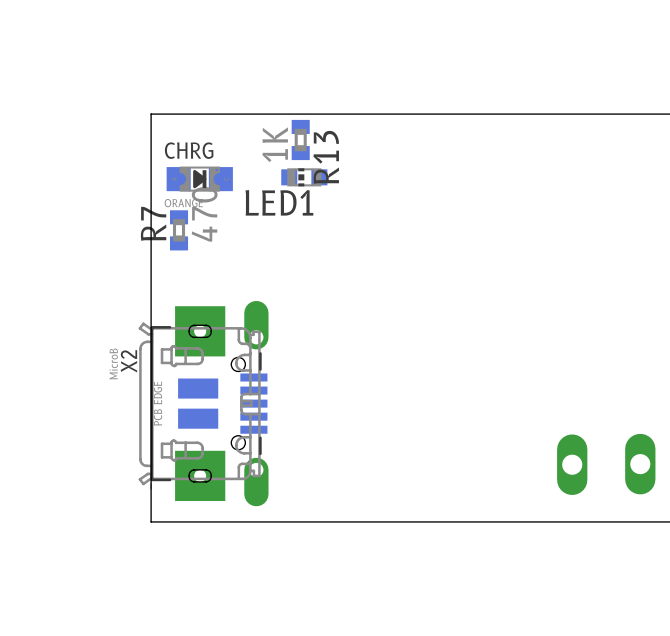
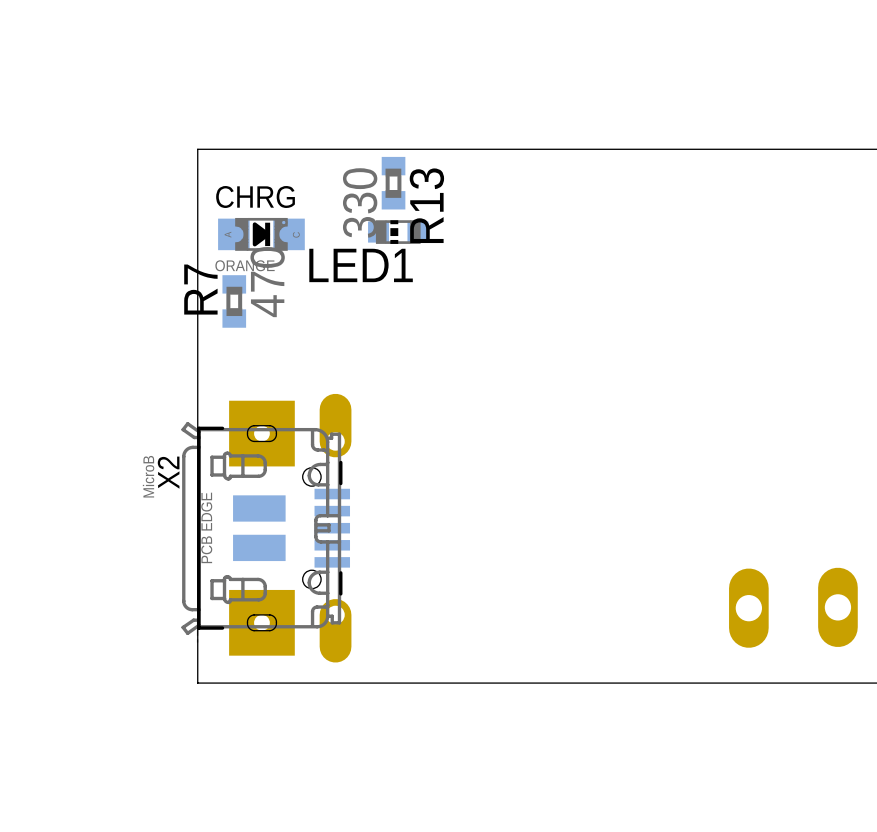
R13 value: 1K (275, 144) -> 330 (360, 202)

